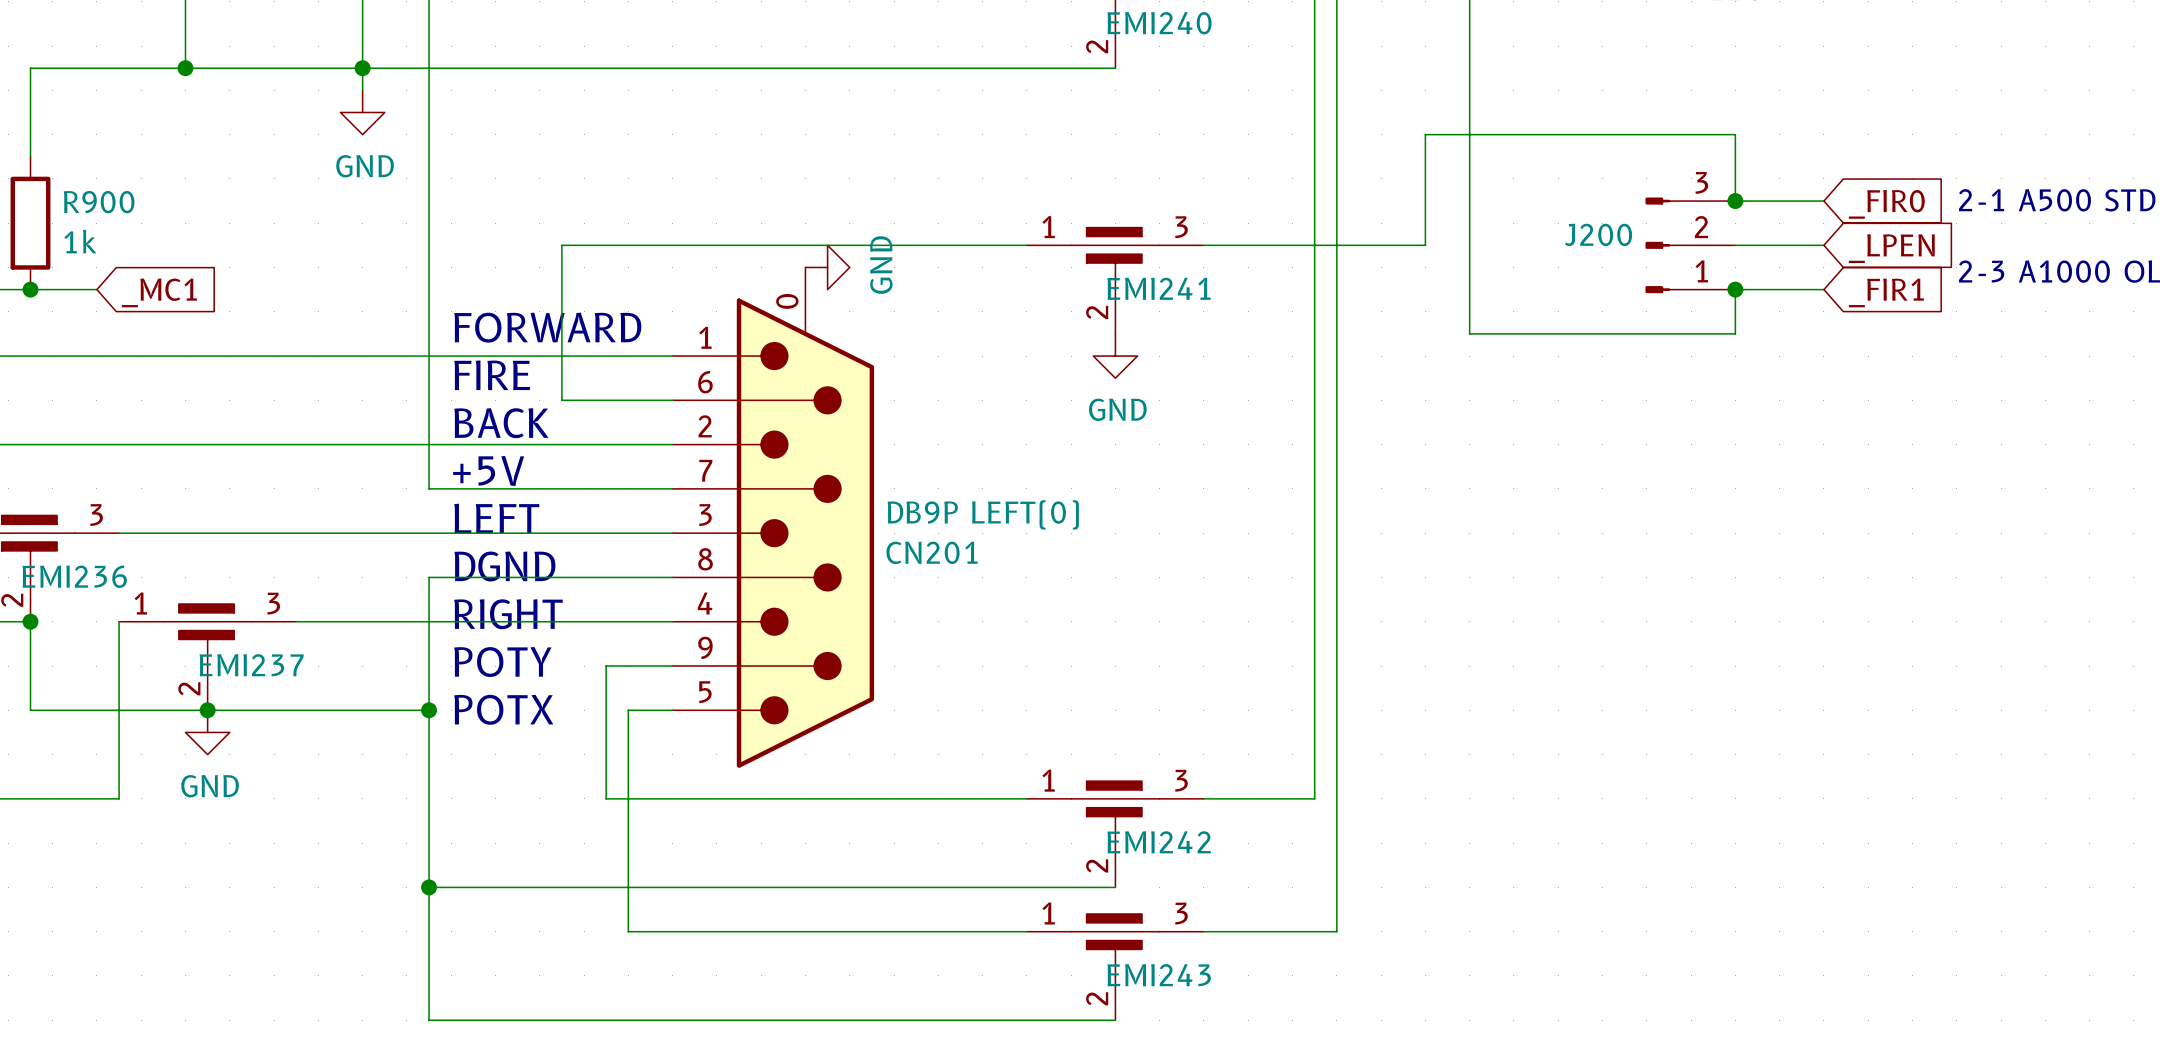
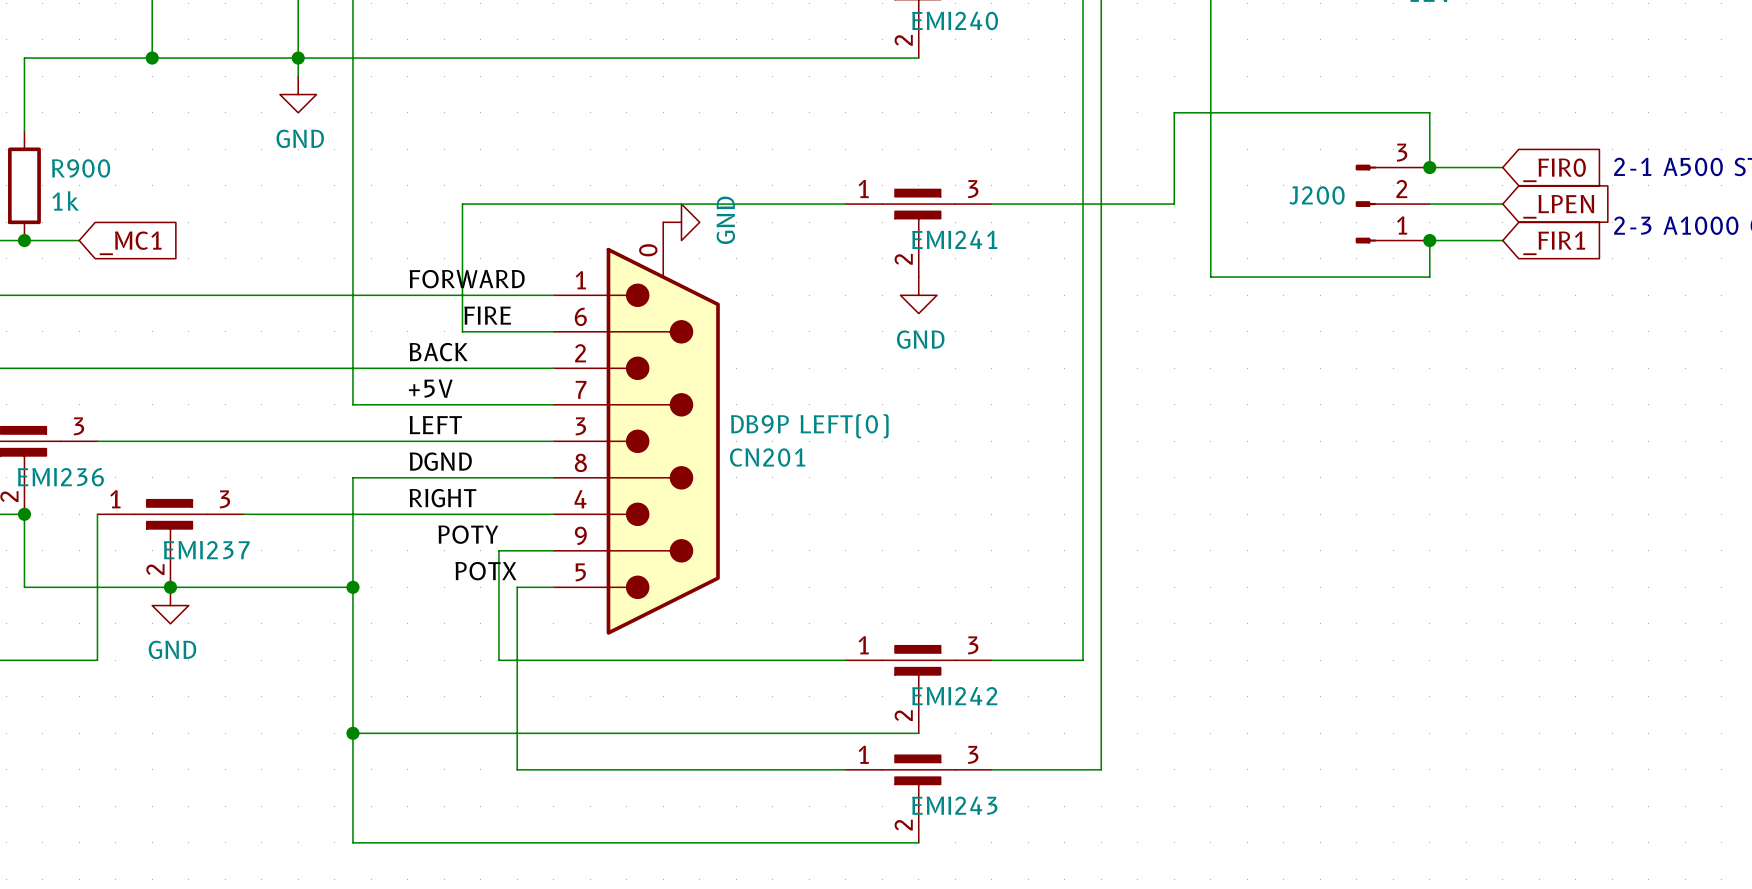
text: FORWARD (547, 327) -> none
label: none -> FORWARD (467, 279)
text: FIRE (492, 375) -> none
label: none -> FIRE (487, 315)
text: BACK (501, 423) -> none
label: none -> BACK (438, 352)
label: none -> +5V (430, 388)
text: +5V (488, 470) -> none
label: none -> LEFT (435, 425)
text: LEFT (496, 518) -> none
label: none -> DGND (440, 461)
text: DGND (504, 566) -> none
label: none -> RIGHT (442, 498)
text: RIGHT (508, 614) -> none
label: none -> POTY (468, 534)
text: POTY (502, 662) -> none
label: none -> POTX (485, 571)
text: POTX (503, 709) -> none

